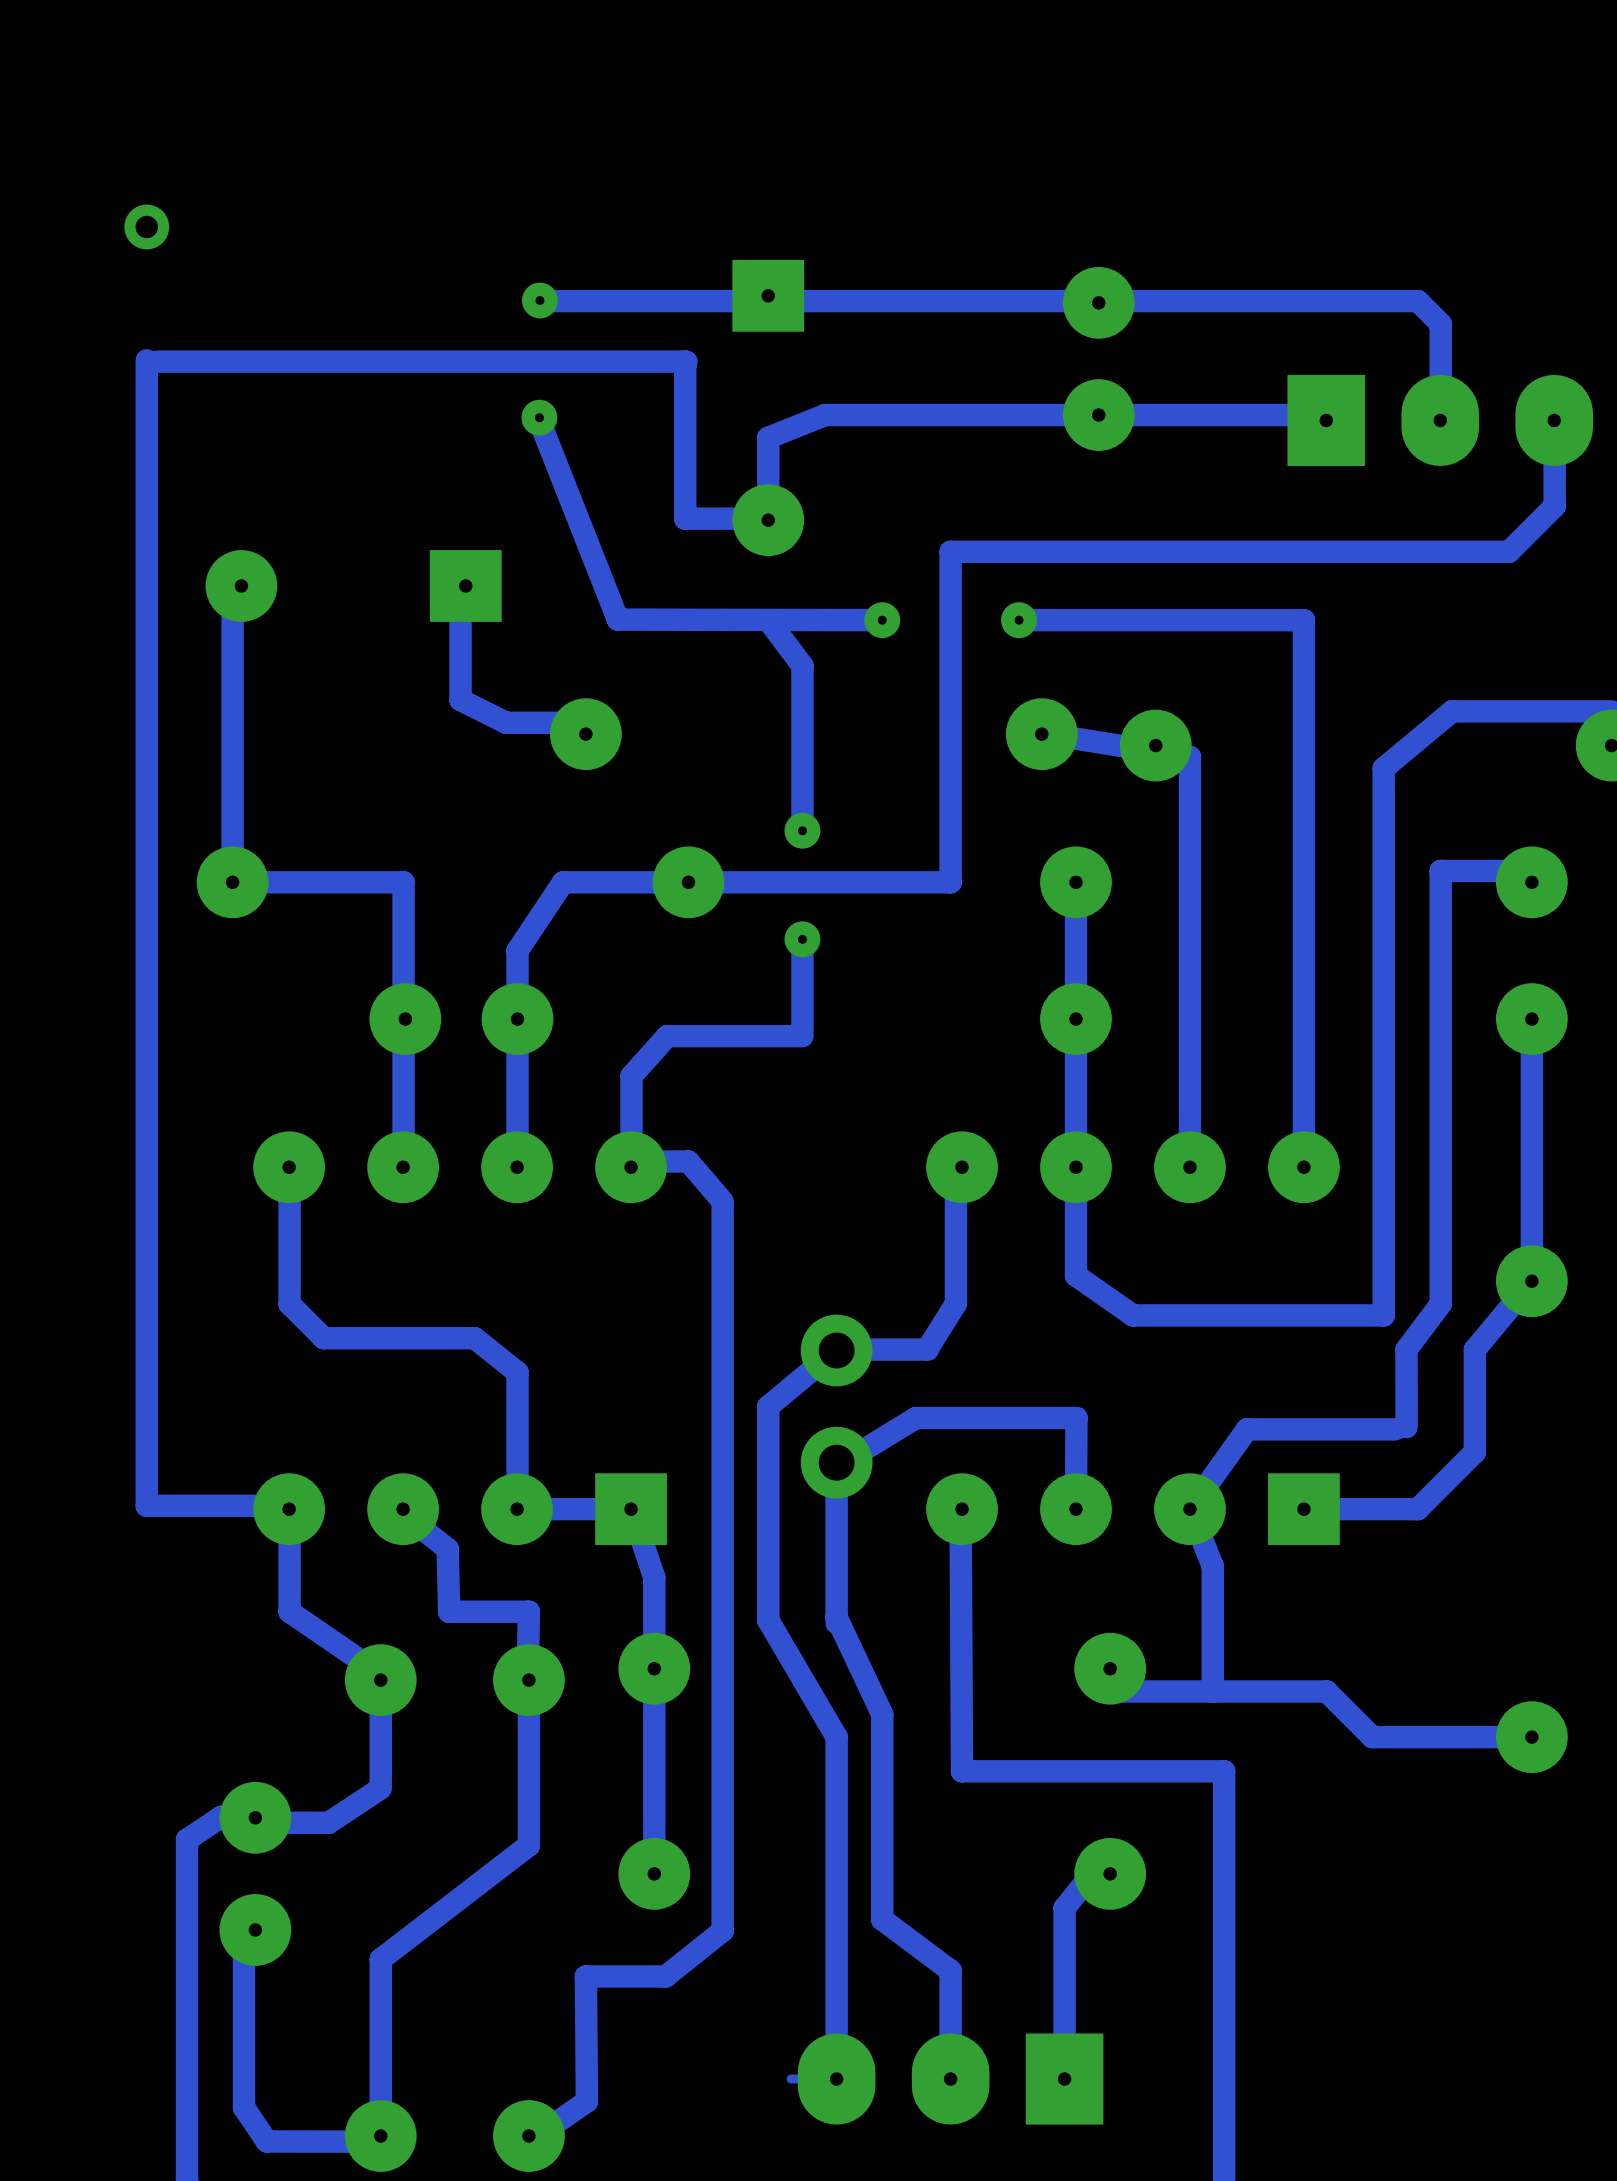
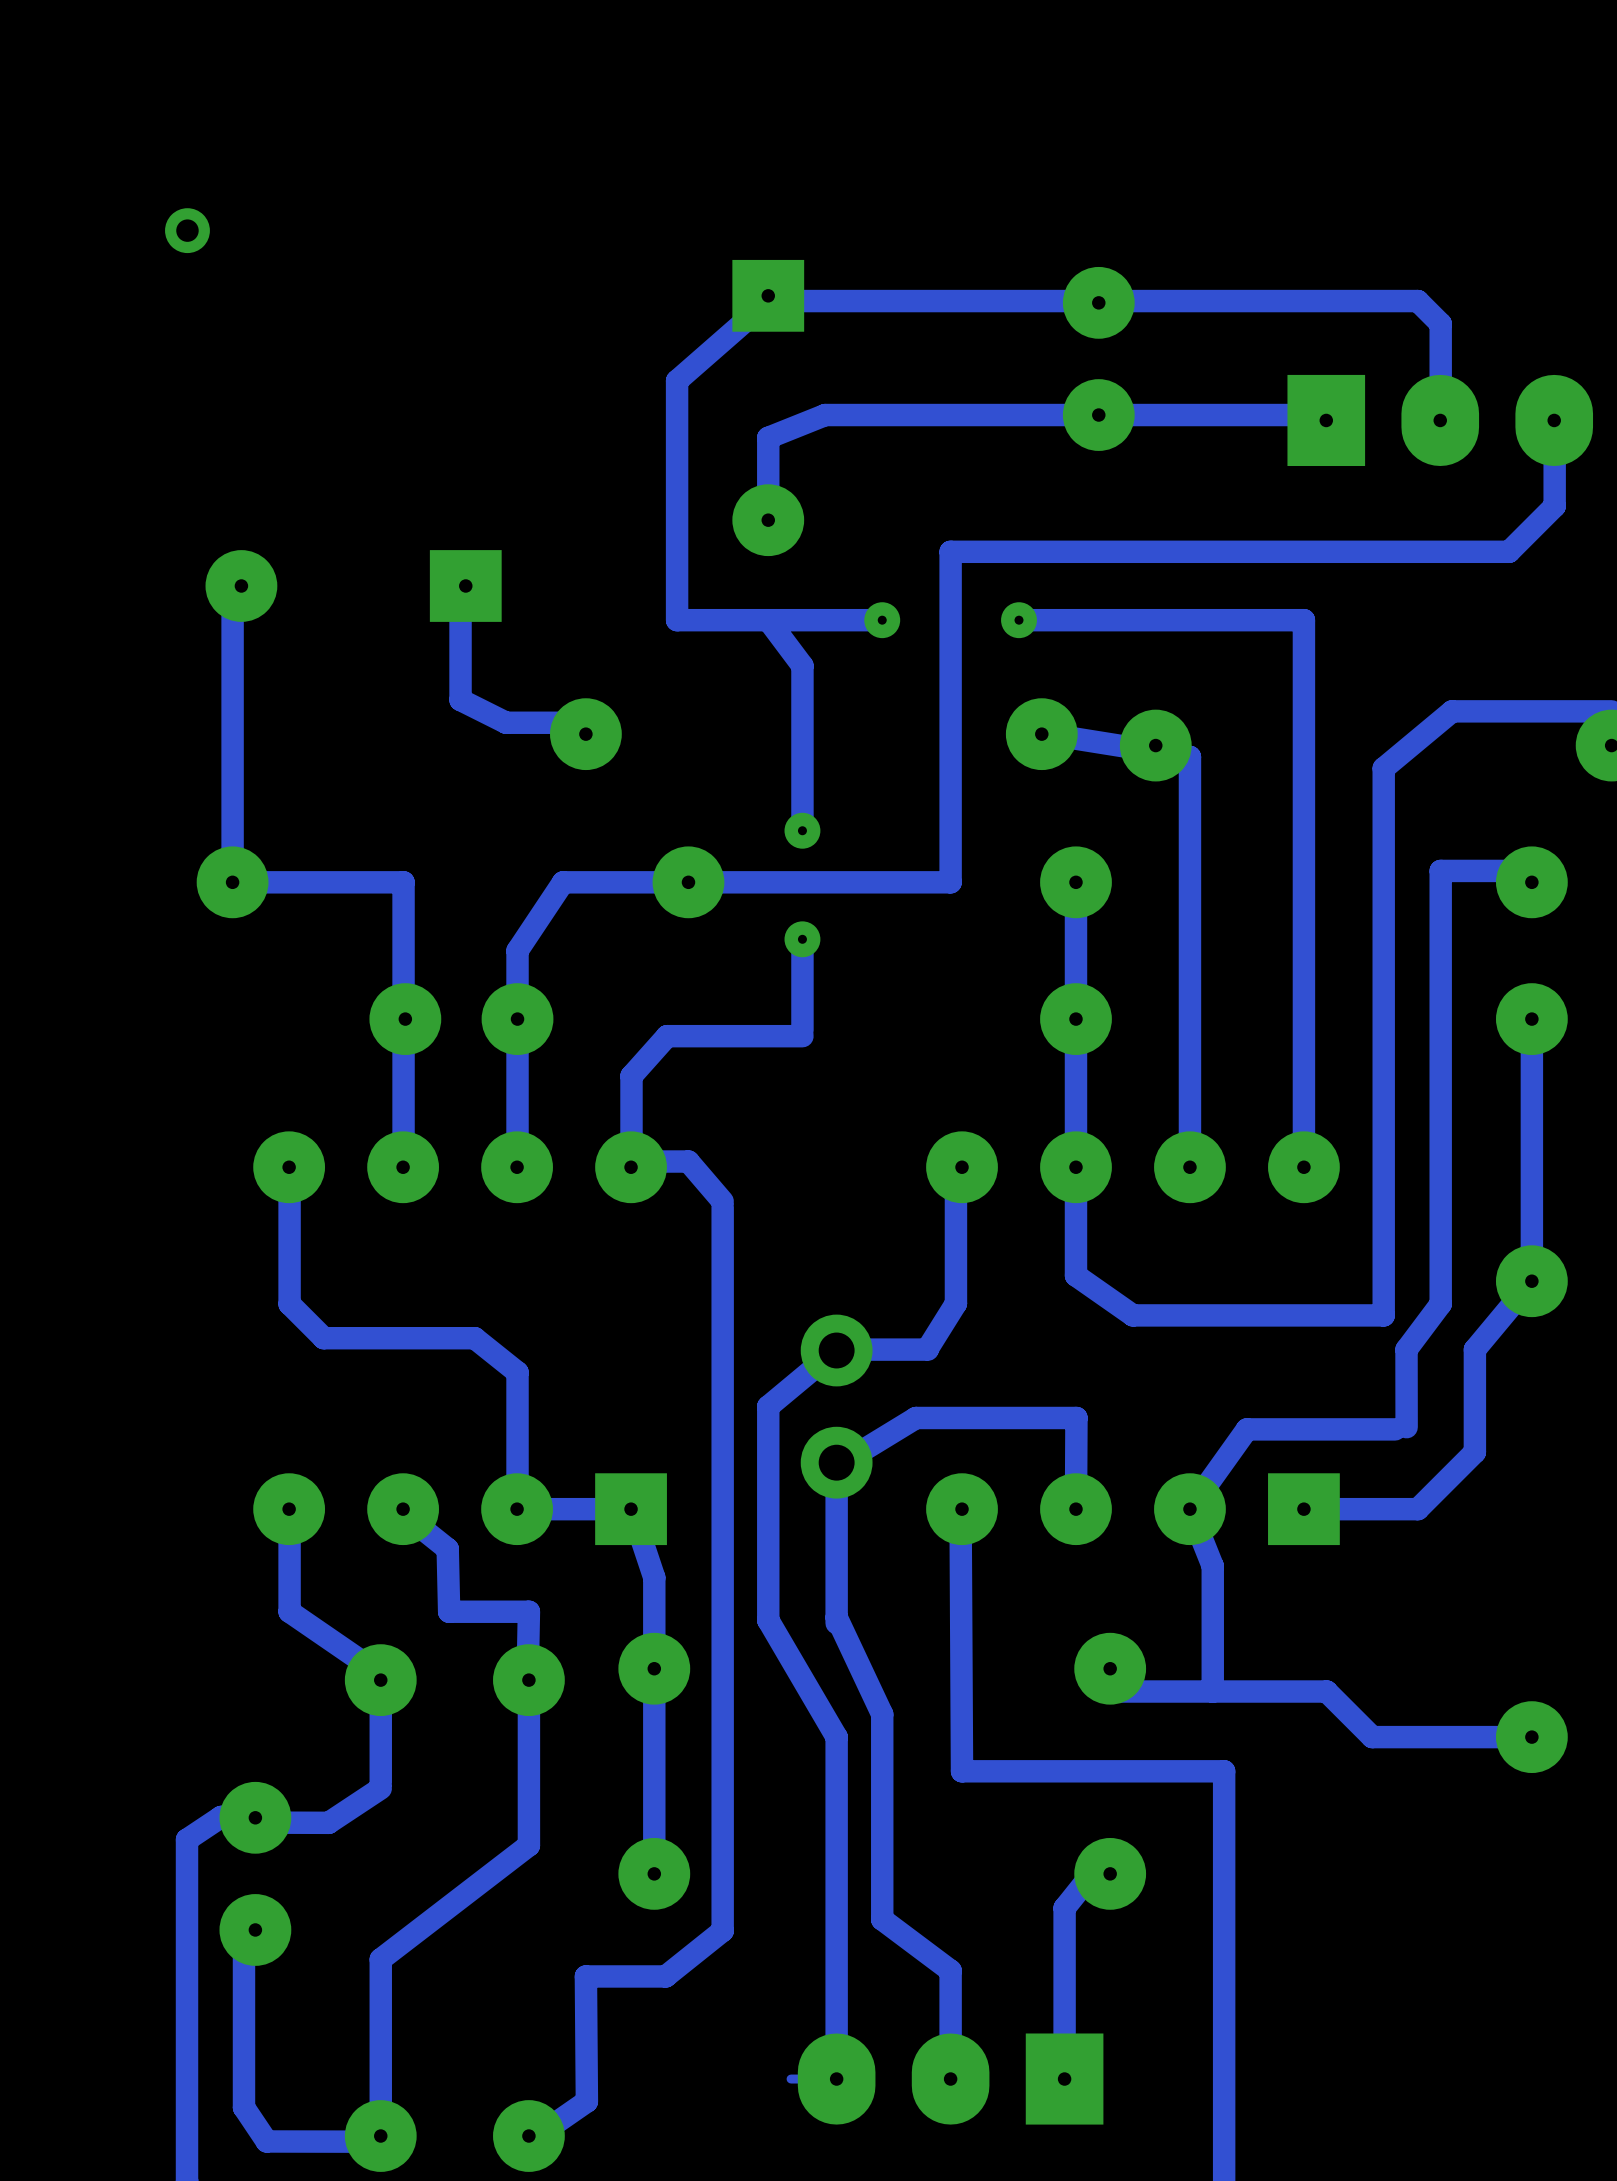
via position: (146, 227) -> (187, 230)
via: (539, 300) -> none
track: (768, 301) (539, 301) -> none
track: (146, 360) (146, 1505) (289, 1505) -> none
track: (685, 361) (685, 518) (765, 518) -> none
track: (686, 361) (157, 361) -> none
track: (538, 417) (617, 619) (882, 620) -> (768, 301) (677, 380) (677, 620) (882, 620)
via: (539, 417) -> none

